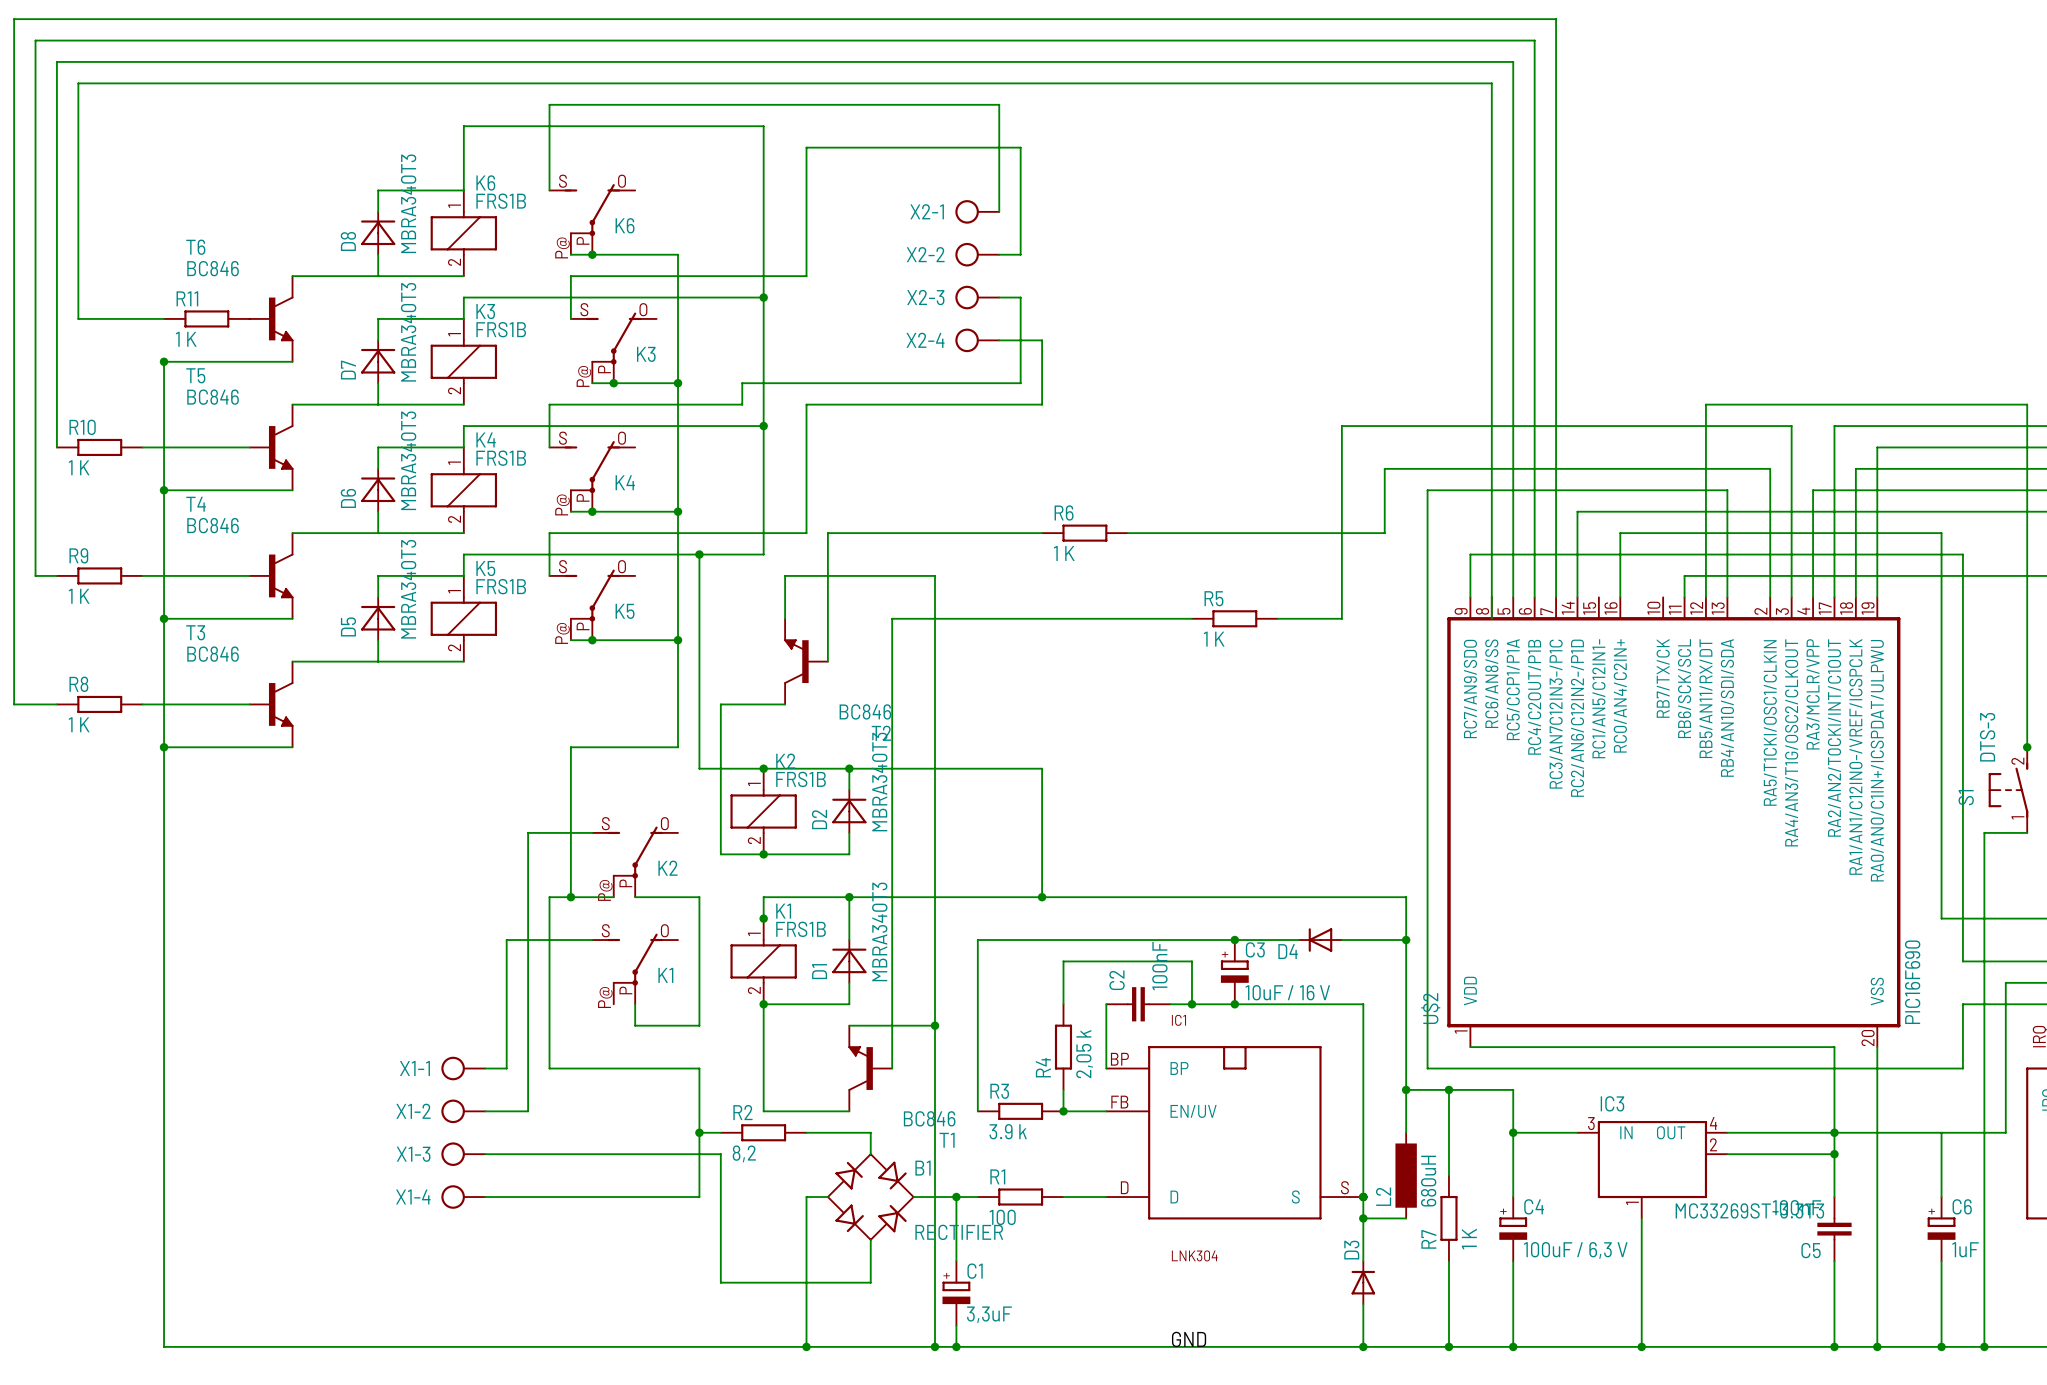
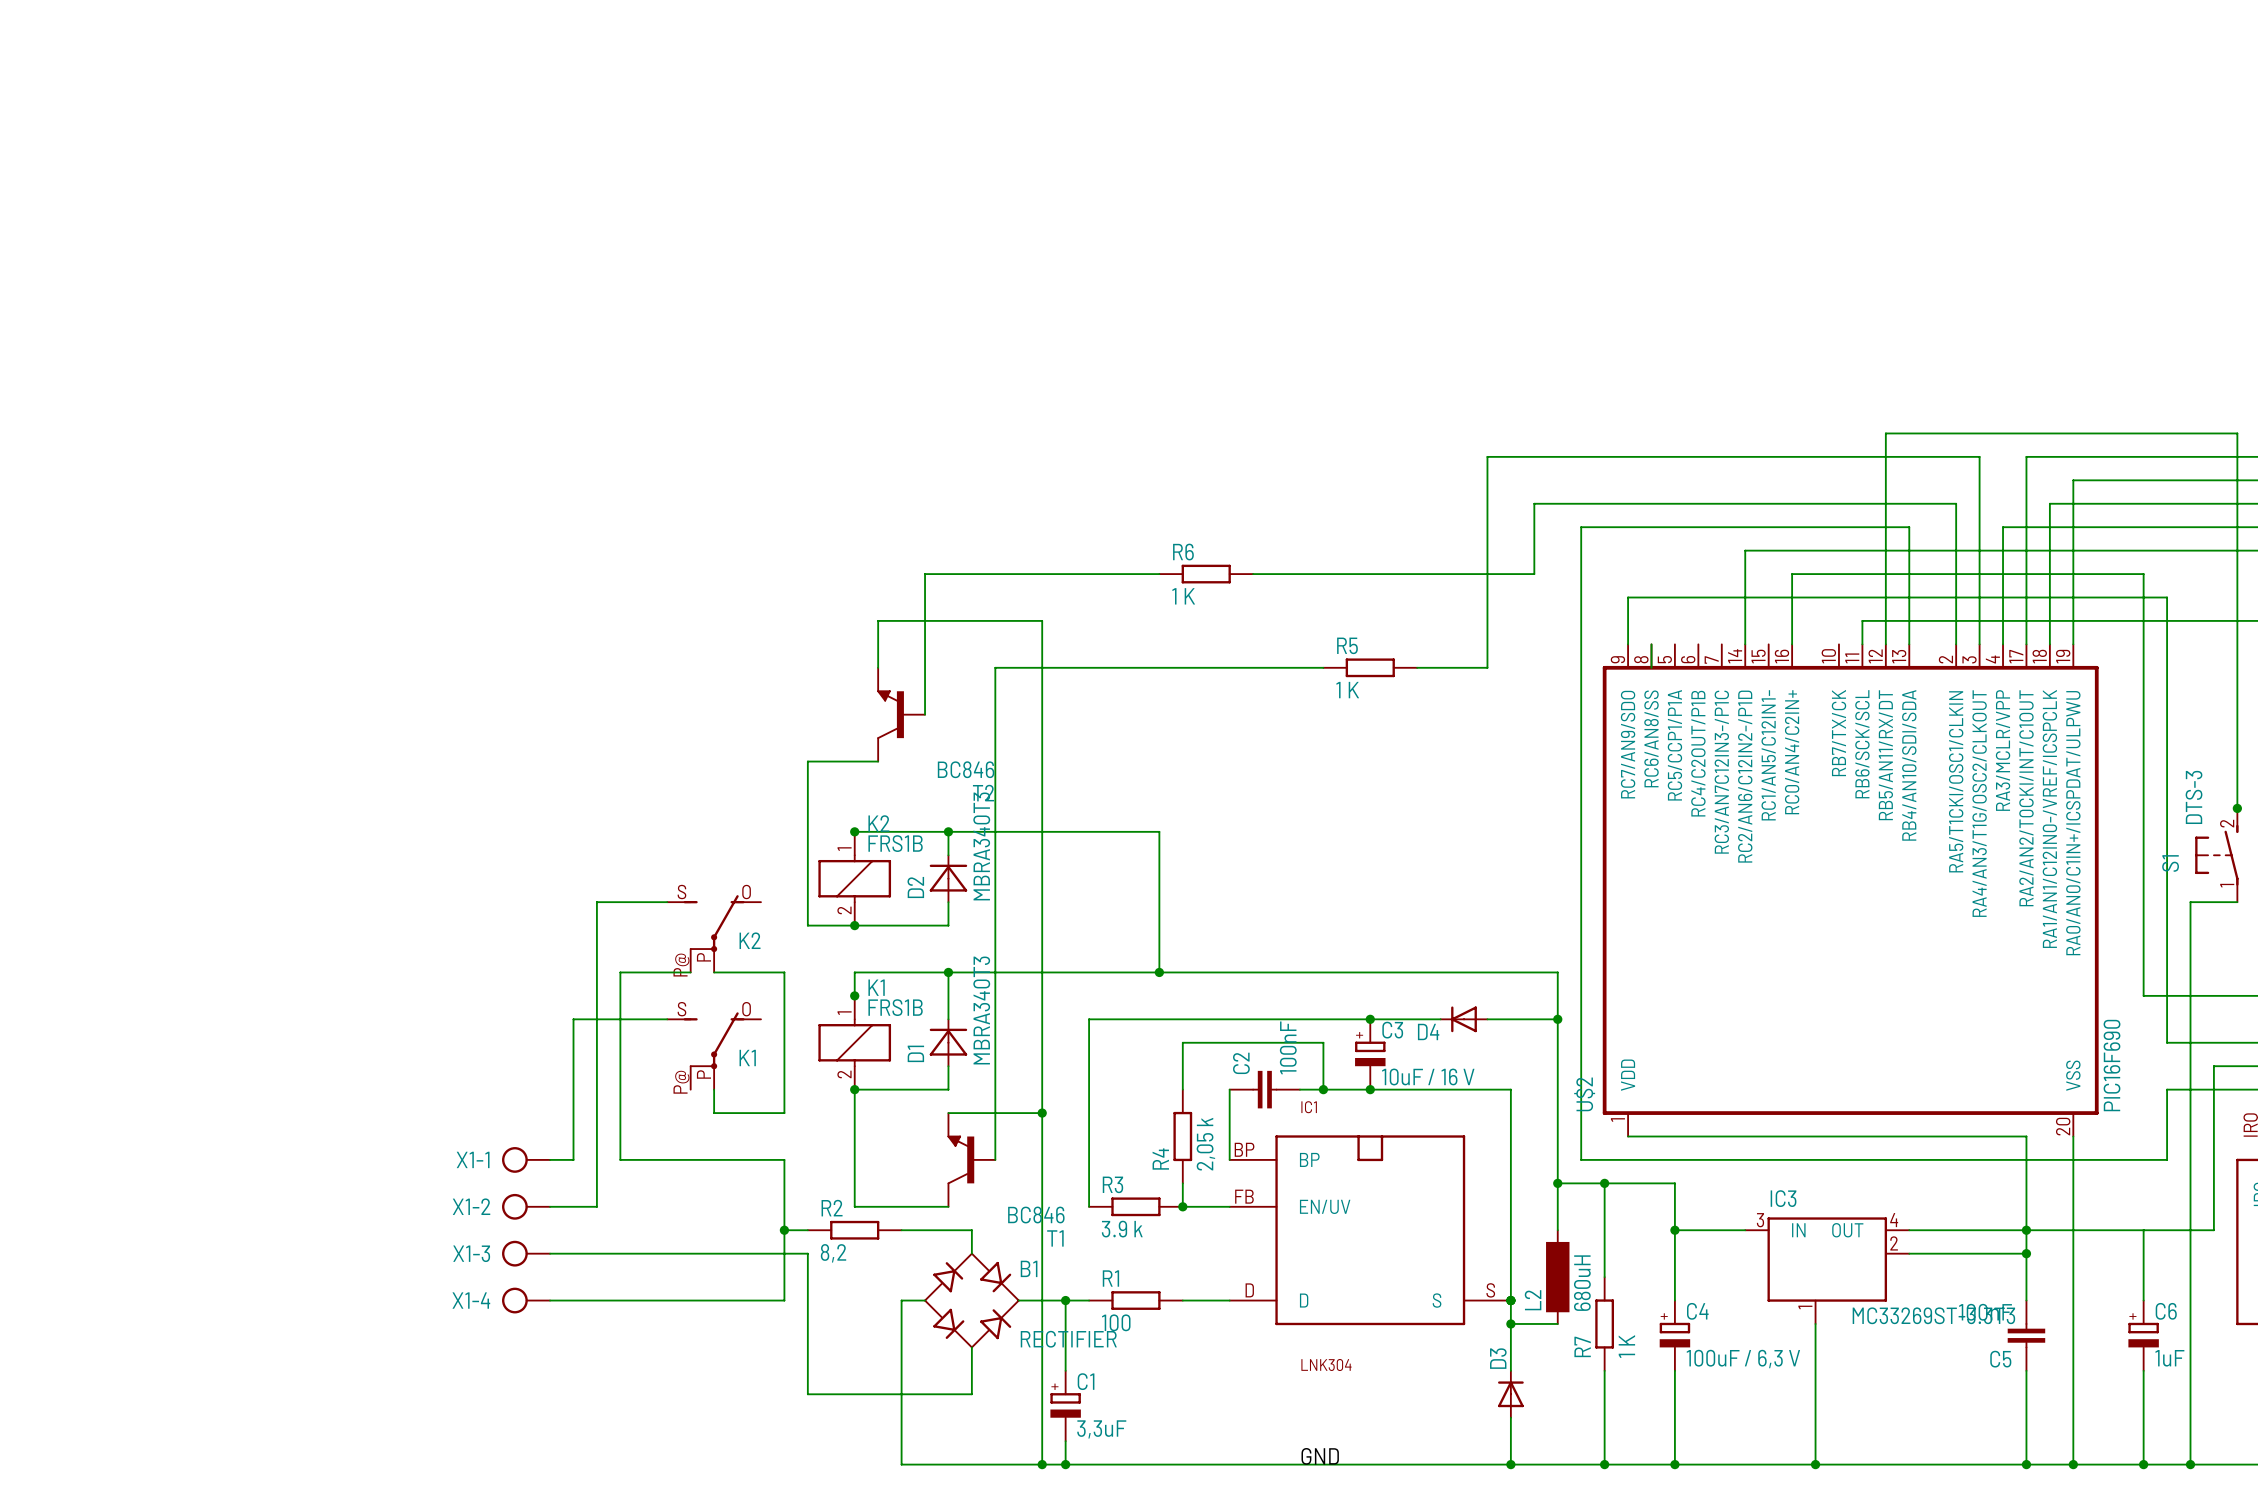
wire: (549, 190) (549, 104) (999, 104) (999, 211) -> none
wire: (378, 211) (378, 190) (463, 190) (463, 126) (763, 126) (763, 554) (463, 554) (463, 575) (378, 575) (378, 597) -> none
X2-1: (977, 211) -> none
K6: (592, 219) -> none
D8: MBRA340T3 (378, 233) -> none
K6: FRS1B (463, 233) -> none
wire: (378, 254) (378, 276) -> none
wire: (570, 254) (678, 254) (678, 747) (570, 747) (570, 897) -> none
junction: (592, 254) -> none
X2-2: (977, 254) -> none
wire: (999, 254) (1020, 254) (1020, 147) (806, 147) (806, 276) (570, 276) (570, 318) -> none
wire: (292, 276) (463, 276) -> none
wire: (763, 297) (463, 297) (463, 318) (378, 318) (378, 340) -> none
junction: (763, 297) -> none
X2-3: (977, 297) -> none
wire: (999, 297) (1020, 297) (1020, 383) (742, 383) (742, 404) (549, 404) (549, 447) -> none
wire: (164, 318) (78, 318) (78, 83) (1491, 83) (1491, 597) -> none
R11: 1 K (206, 318) -> none
T6: BC846 (271, 318) -> none
X2-4: (977, 340) -> none
wire: (999, 340) (1042, 340) (1042, 404) (806, 404) (806, 533) (549, 533) (549, 575) -> none
K3: (613, 347) -> none
junction: (164, 361) -> none
wire: (292, 361) (164, 361) (164, 1346) (806, 1346) -> none
D7: MBRA340T3 (378, 361) -> none
K3: FRS1B (463, 361) -> none
wire: (378, 383) (378, 404) -> none
wire: (592, 383) (678, 383) -> none
junction: (613, 383) -> none
junction: (678, 383) -> none
wire: (292, 404) (463, 404) -> none
wire: (763, 426) (463, 426) (463, 447) (378, 447) (378, 468) -> none
junction: (763, 426) -> none
wire: (56, 447) (56, 61) (1513, 61) (1513, 597) -> none
R10: 1 K (99, 447) -> none
wire: (142, 447) (249, 447) -> none
T5: BC846 (271, 447) -> none
K4: (592, 476) -> none
wire: (164, 490) (292, 490) -> none
junction: (164, 490) -> none
D6: MBRA340T3 (378, 490) -> none
K4: FRS1B (463, 490) -> none
wire: (378, 511) (378, 533) -> none
wire: (570, 511) (678, 511) -> none
junction: (592, 511) -> none
junction: (678, 511) -> none
wire: (292, 533) (463, 533) -> none
wire: (699, 554) (699, 768) (763, 768) -> none
junction: (699, 554) -> none
wire: (56, 575) (35, 575) (35, 40) (1534, 40) (1534, 597) -> none
R9: 1 K (99, 575) -> none
wire: (142, 575) (249, 575) -> none
T4: BC846 (271, 575) -> none
wire: (1556, 597) (1556, 19) (14, 19) (14, 704) (56, 704) -> none
K5: (592, 604) -> none
wire: (164, 618) (292, 618) -> none
junction: (164, 618) -> none
D5: MBRA340T3 (378, 618) -> none
K5: FRS1B (463, 618) -> none
wire: (378, 640) (378, 661) -> none
wire: (570, 640) (678, 640) -> none
junction: (592, 640) -> none
junction: (678, 640) -> none
wire: (292, 661) (463, 661) -> none
R8: 1 K (99, 704) -> none
wire: (142, 704) (249, 704) -> none
T3: BC846 (271, 704) -> none
wire: (164, 747) (292, 747) -> none
junction: (164, 747) -> none
junction: (570, 897) -> none
junction: (806, 1346) -> none

